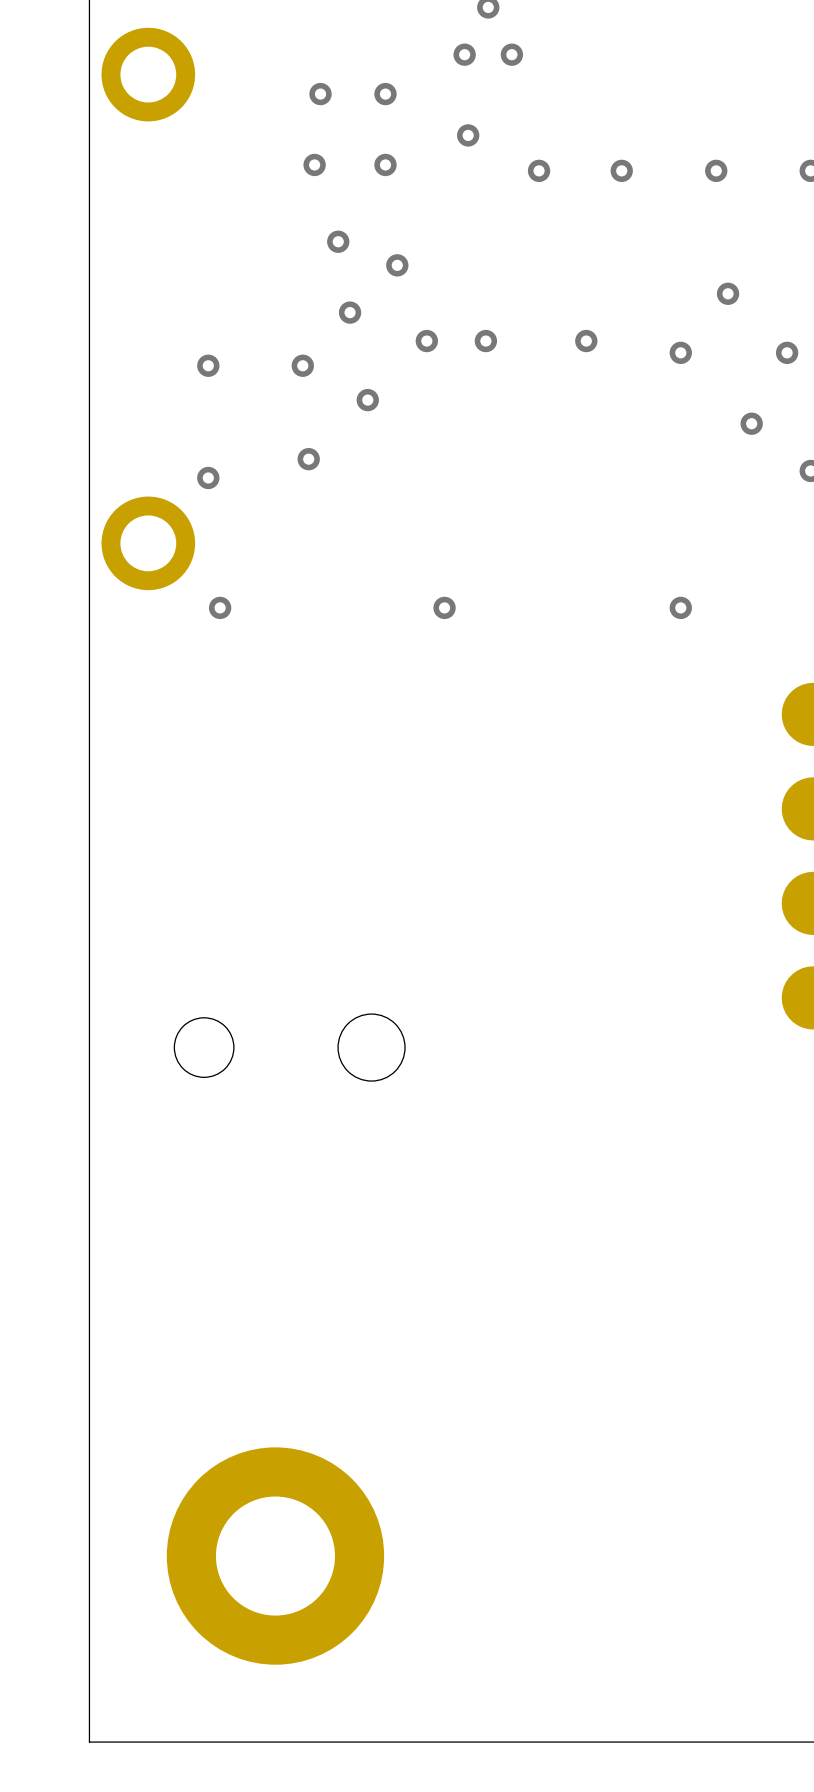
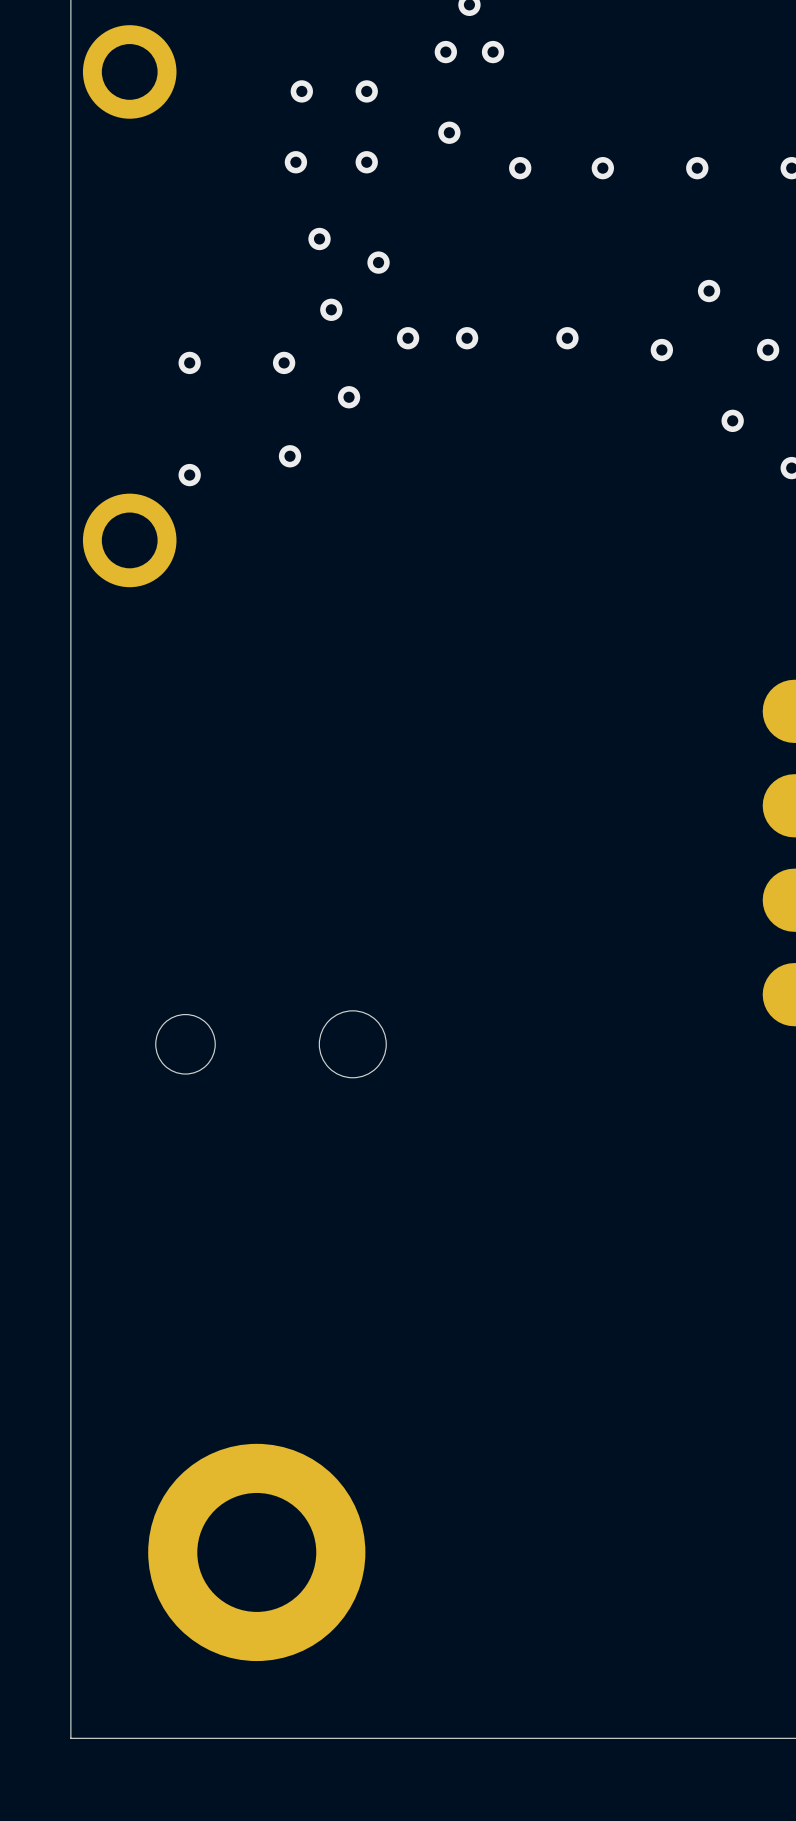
via: (220, 607) -> none
via: (444, 607) -> none
via: (680, 607) -> none

